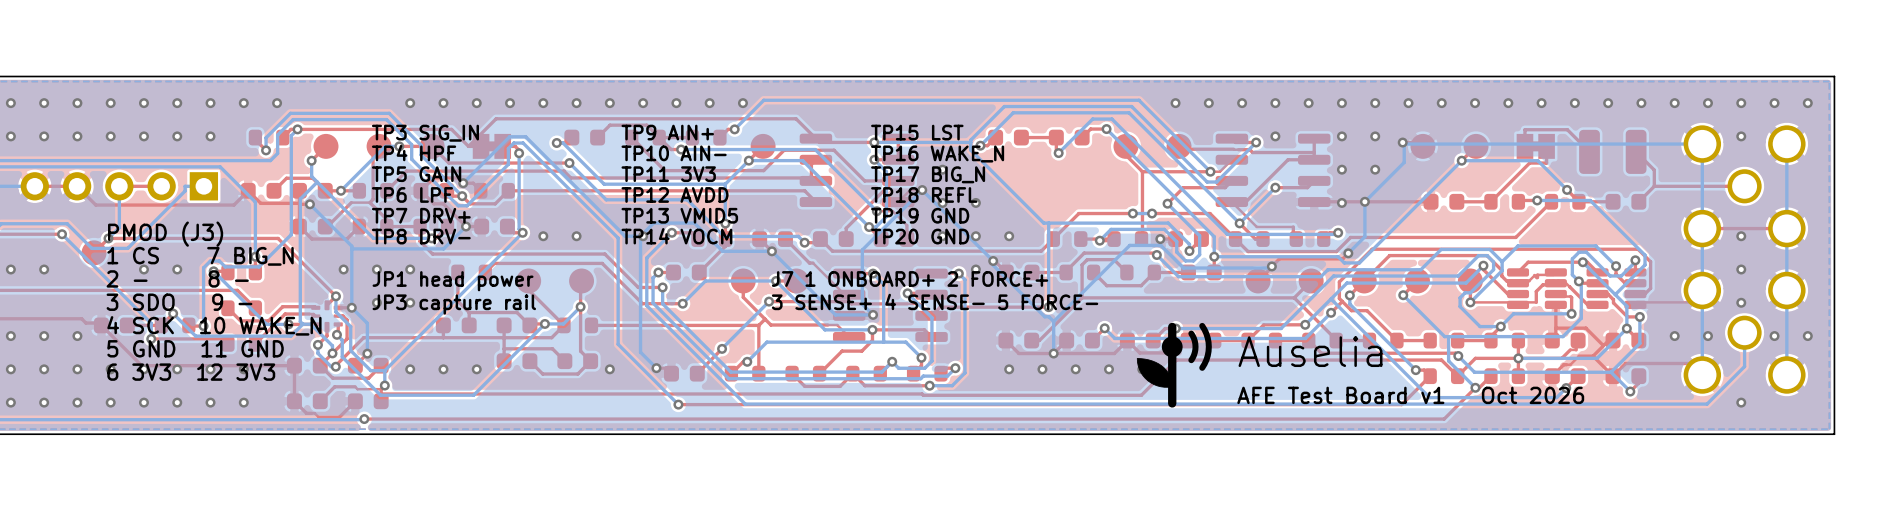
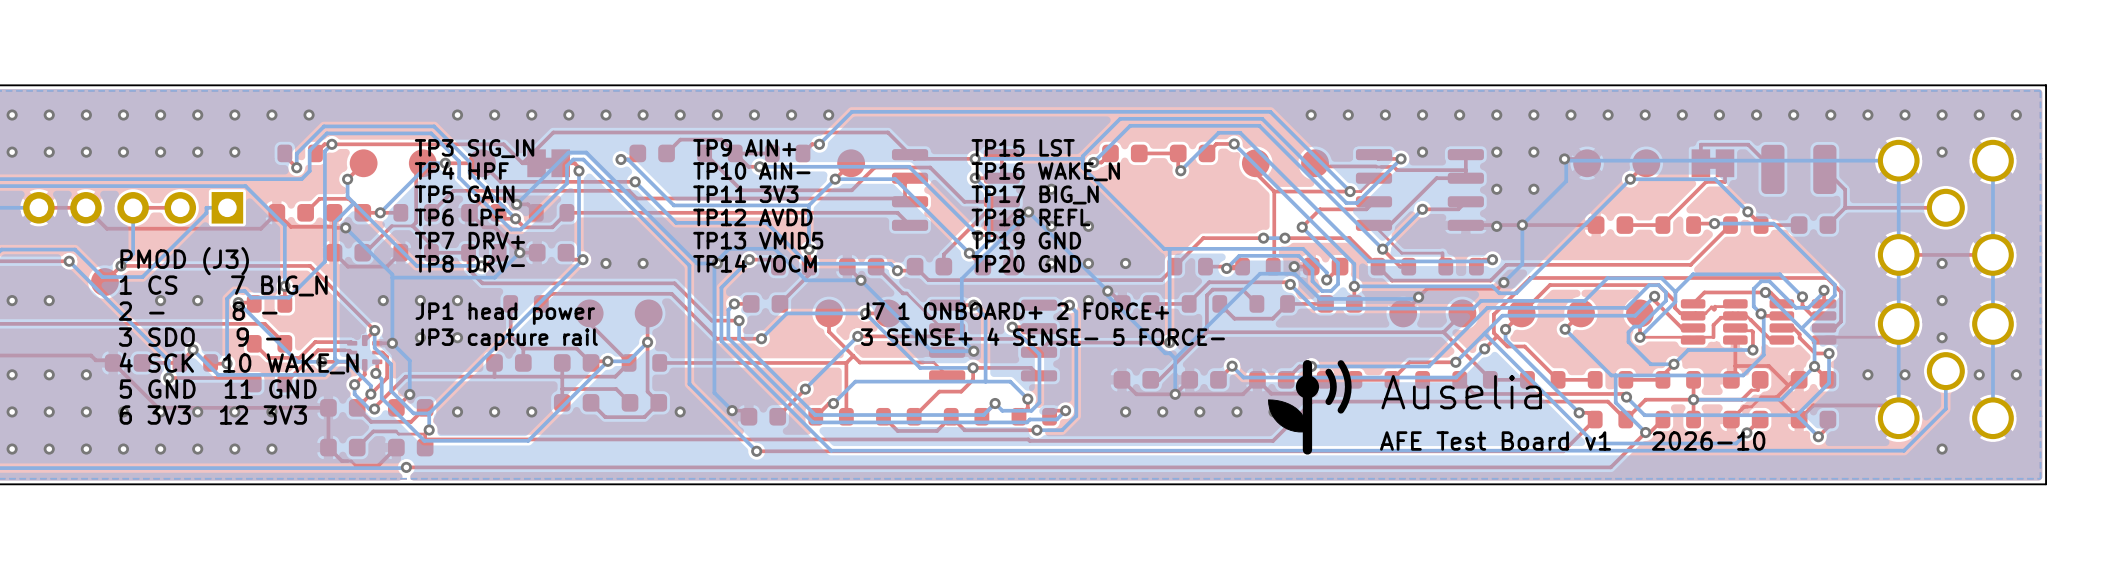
text: AFE Test Board v1 Oct 2026 (1410, 395) -> AFE Test Board v1 2026-10 (1572, 441)

